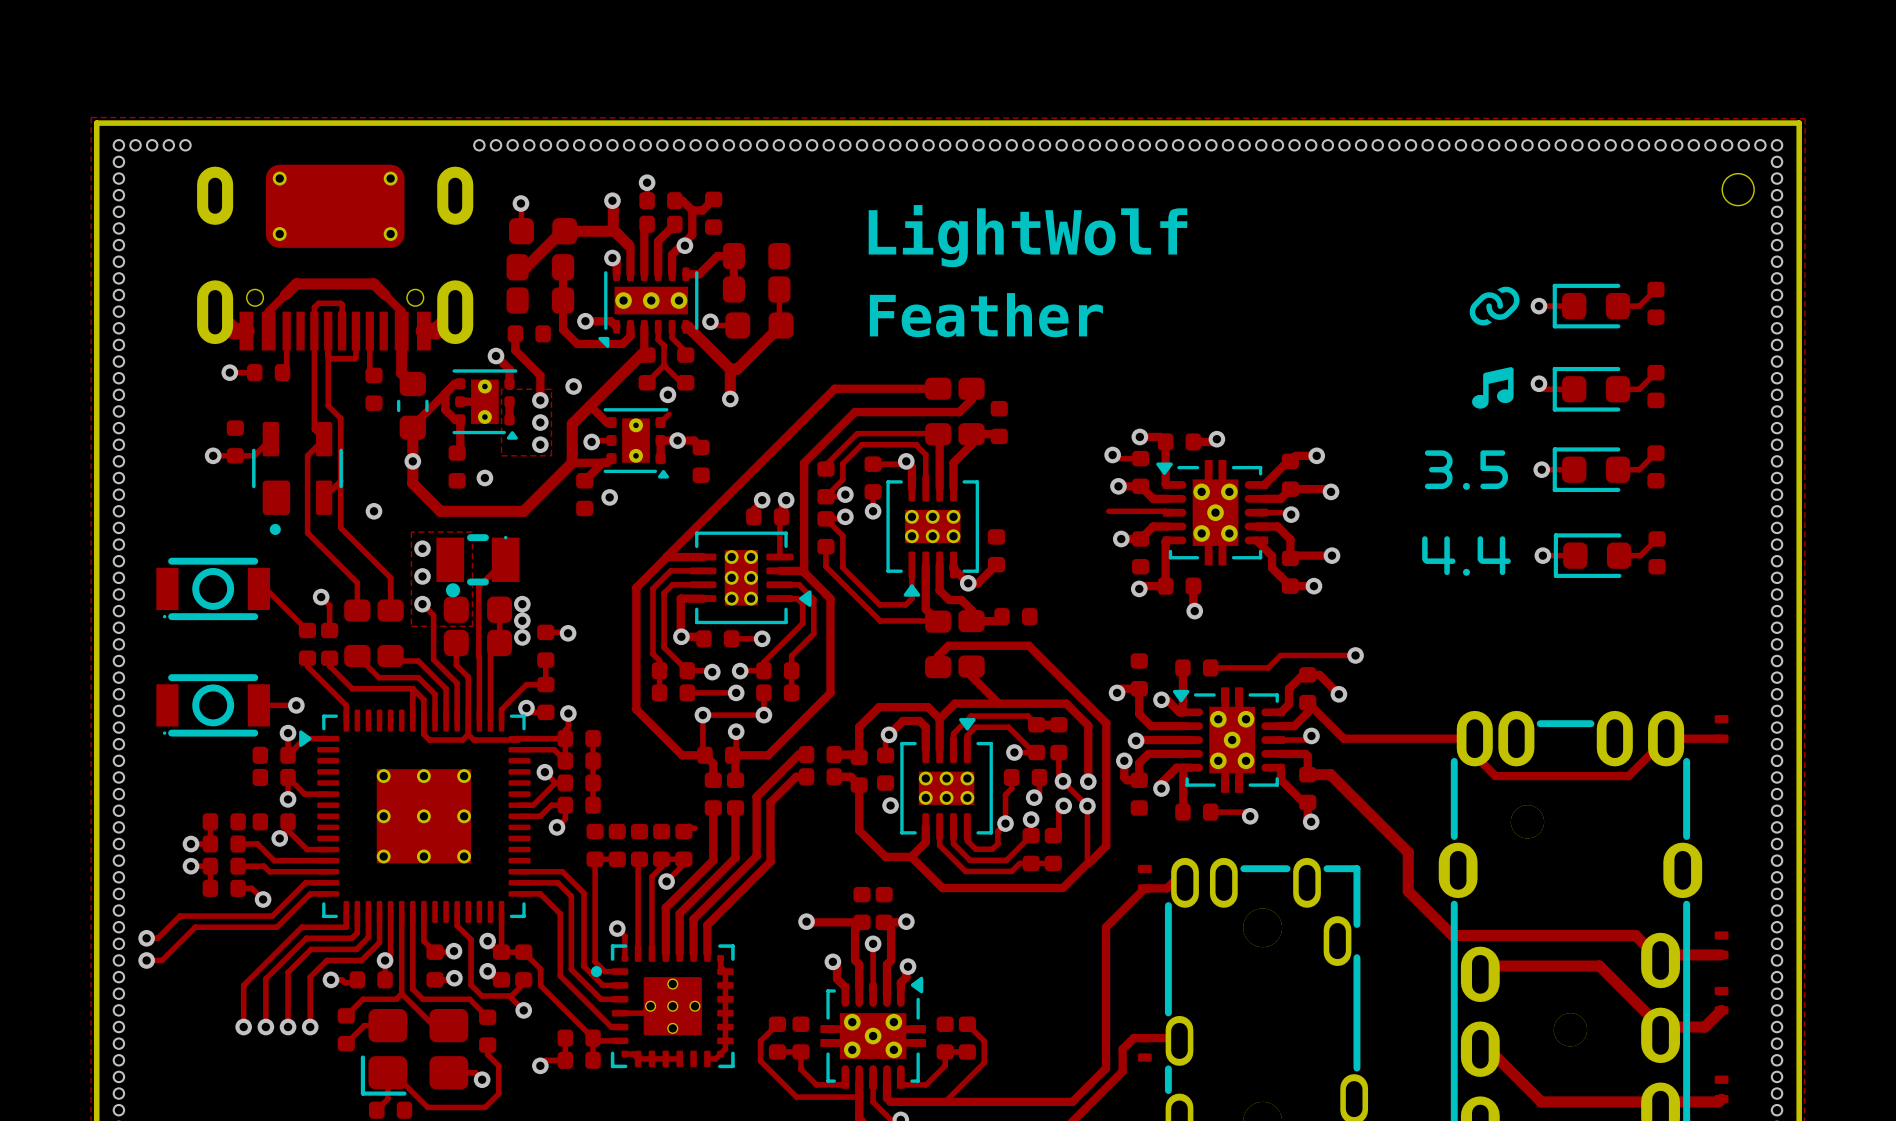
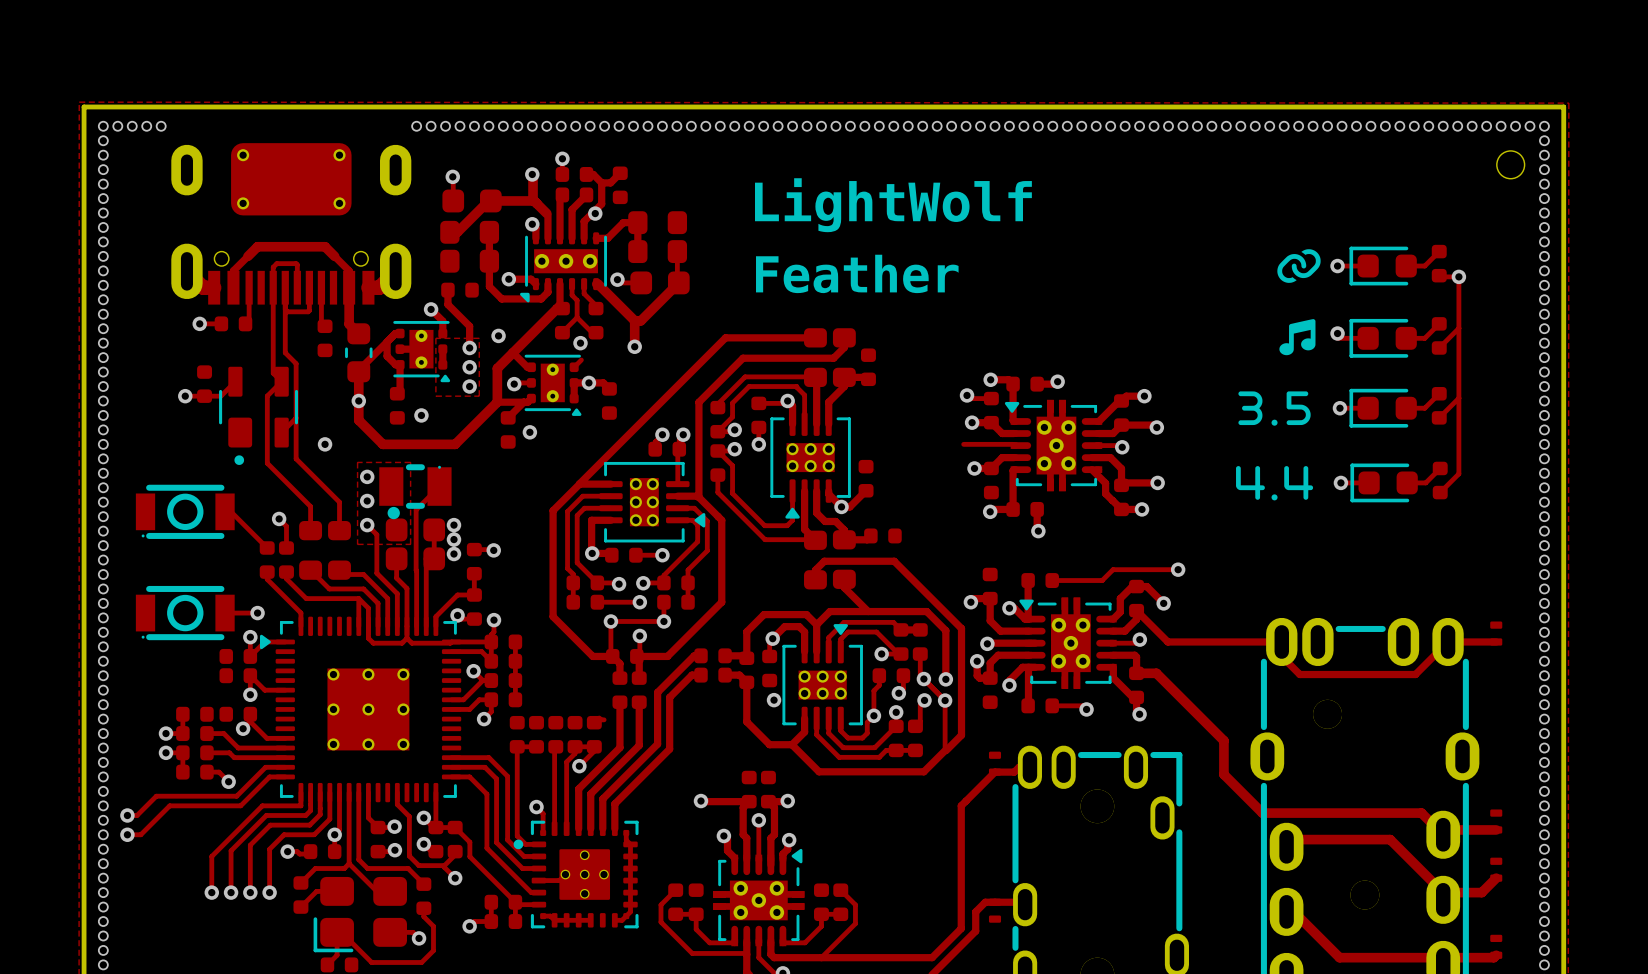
track: none -> (1439, 275) (1458, 276) (1458, 473) (1440, 492)
via: none -> (1458, 276)
track: none -> (1458, 328) (1439, 347)
track: none -> (1458, 398) (1439, 417)

